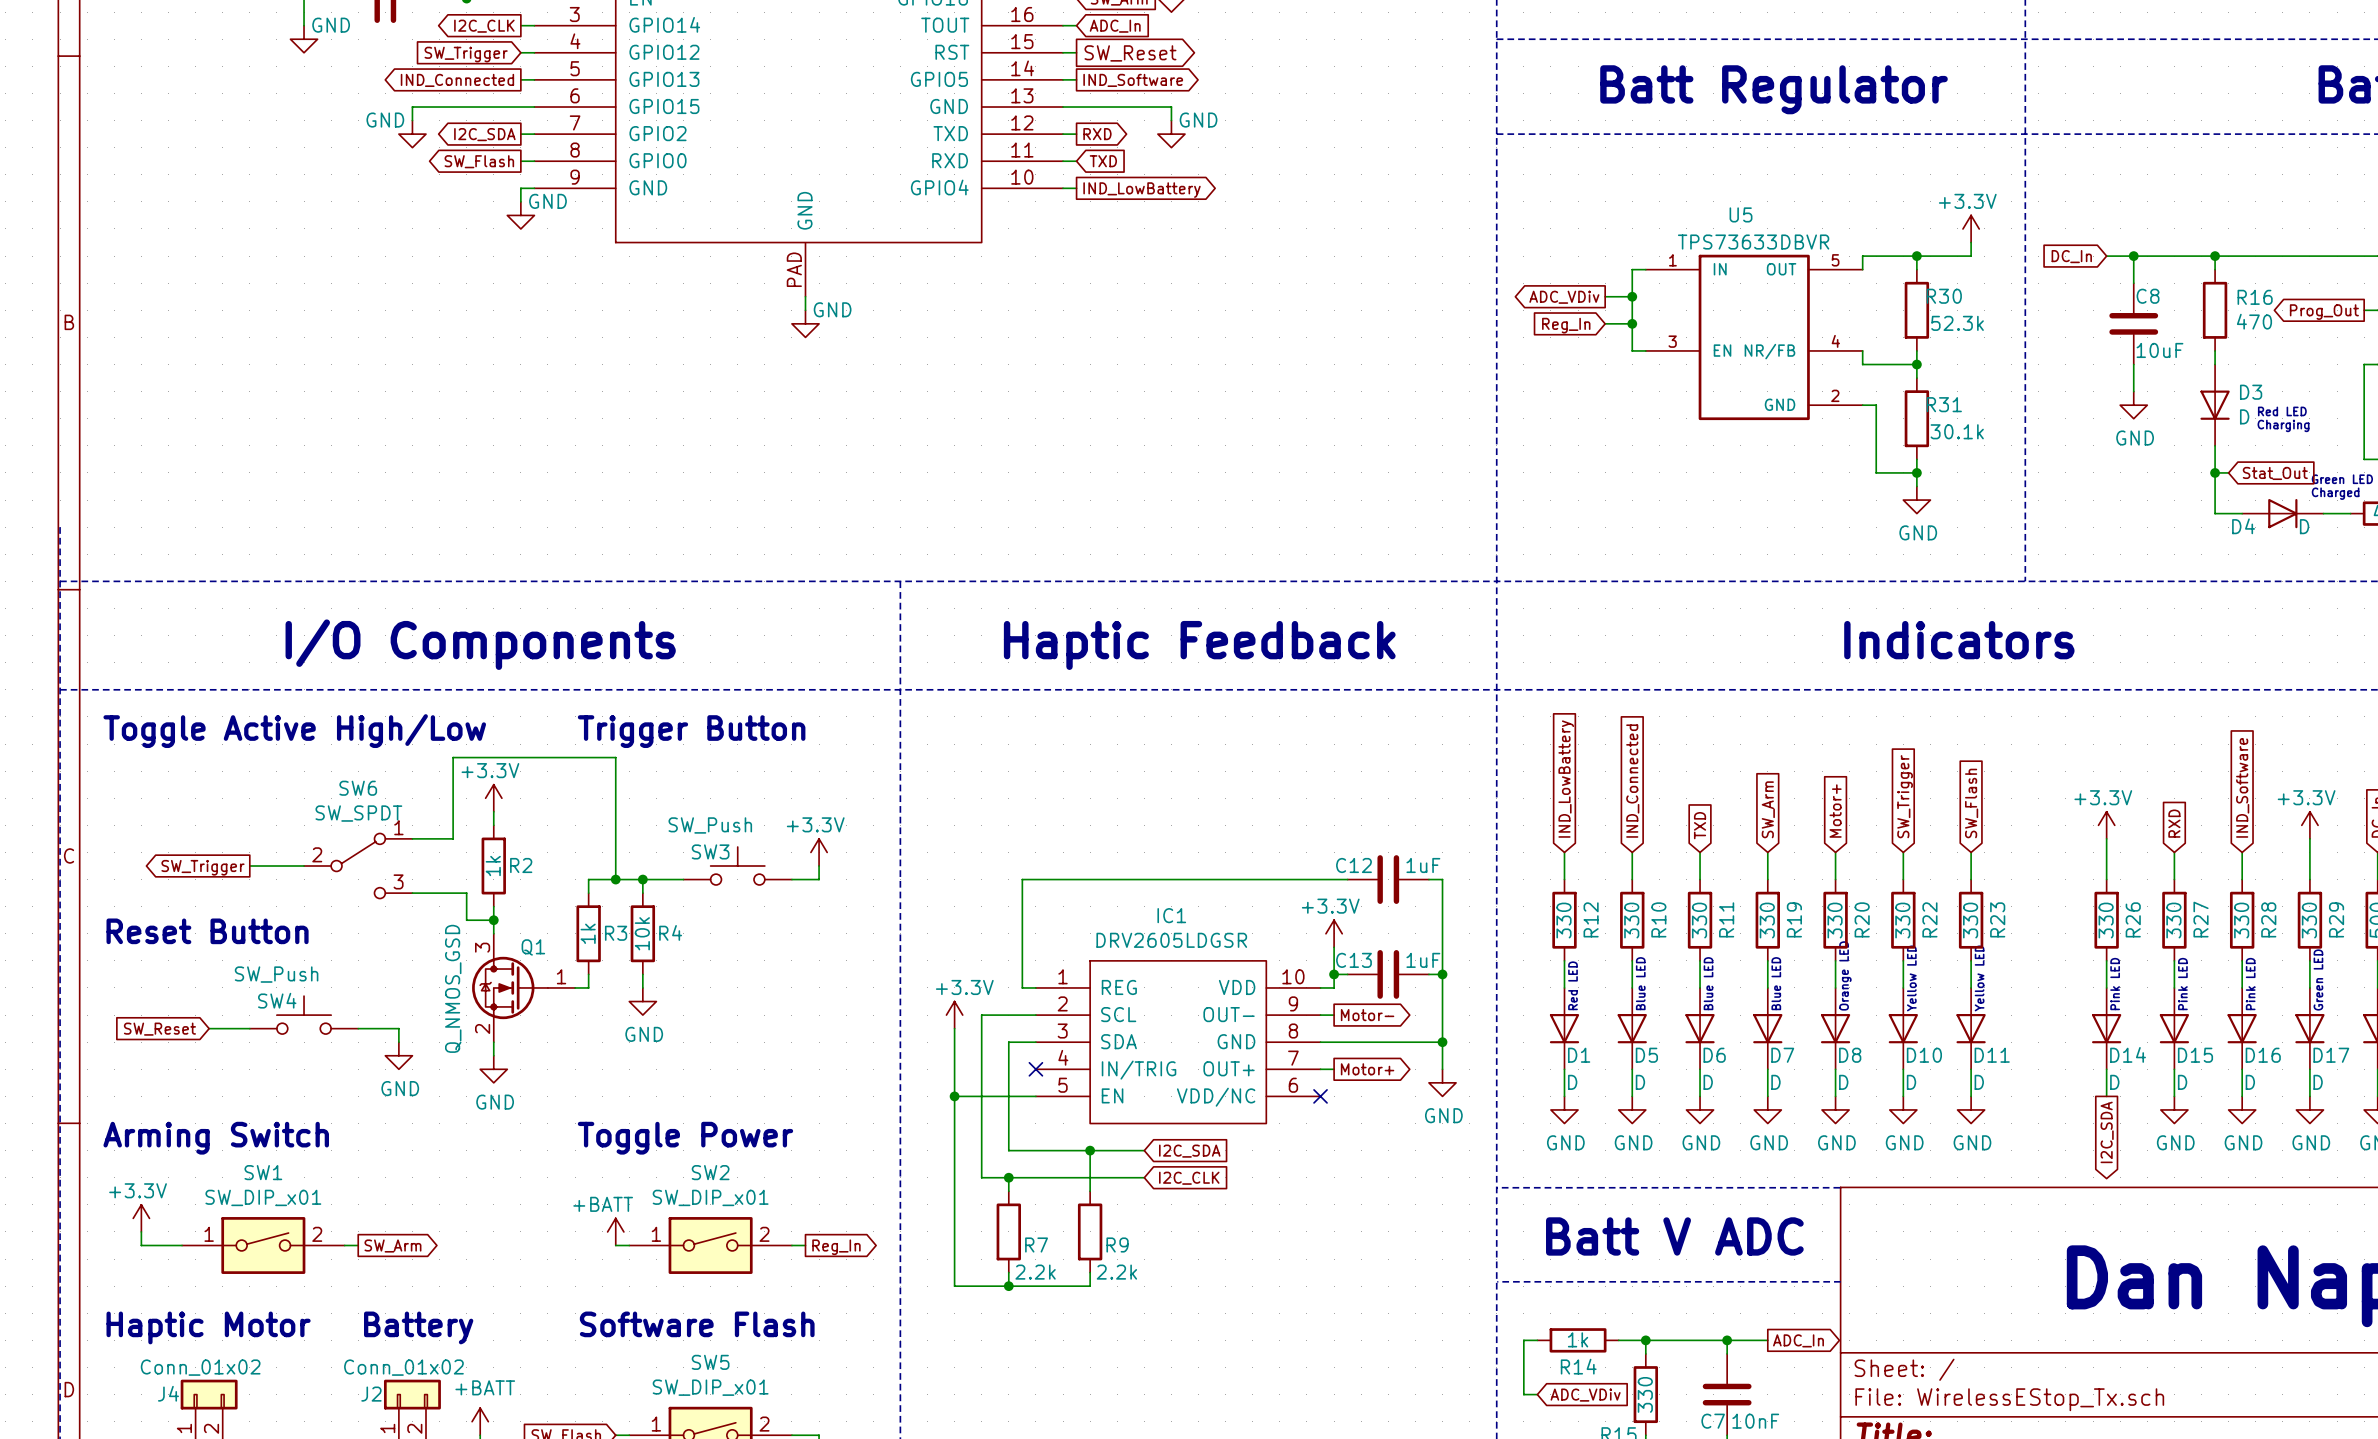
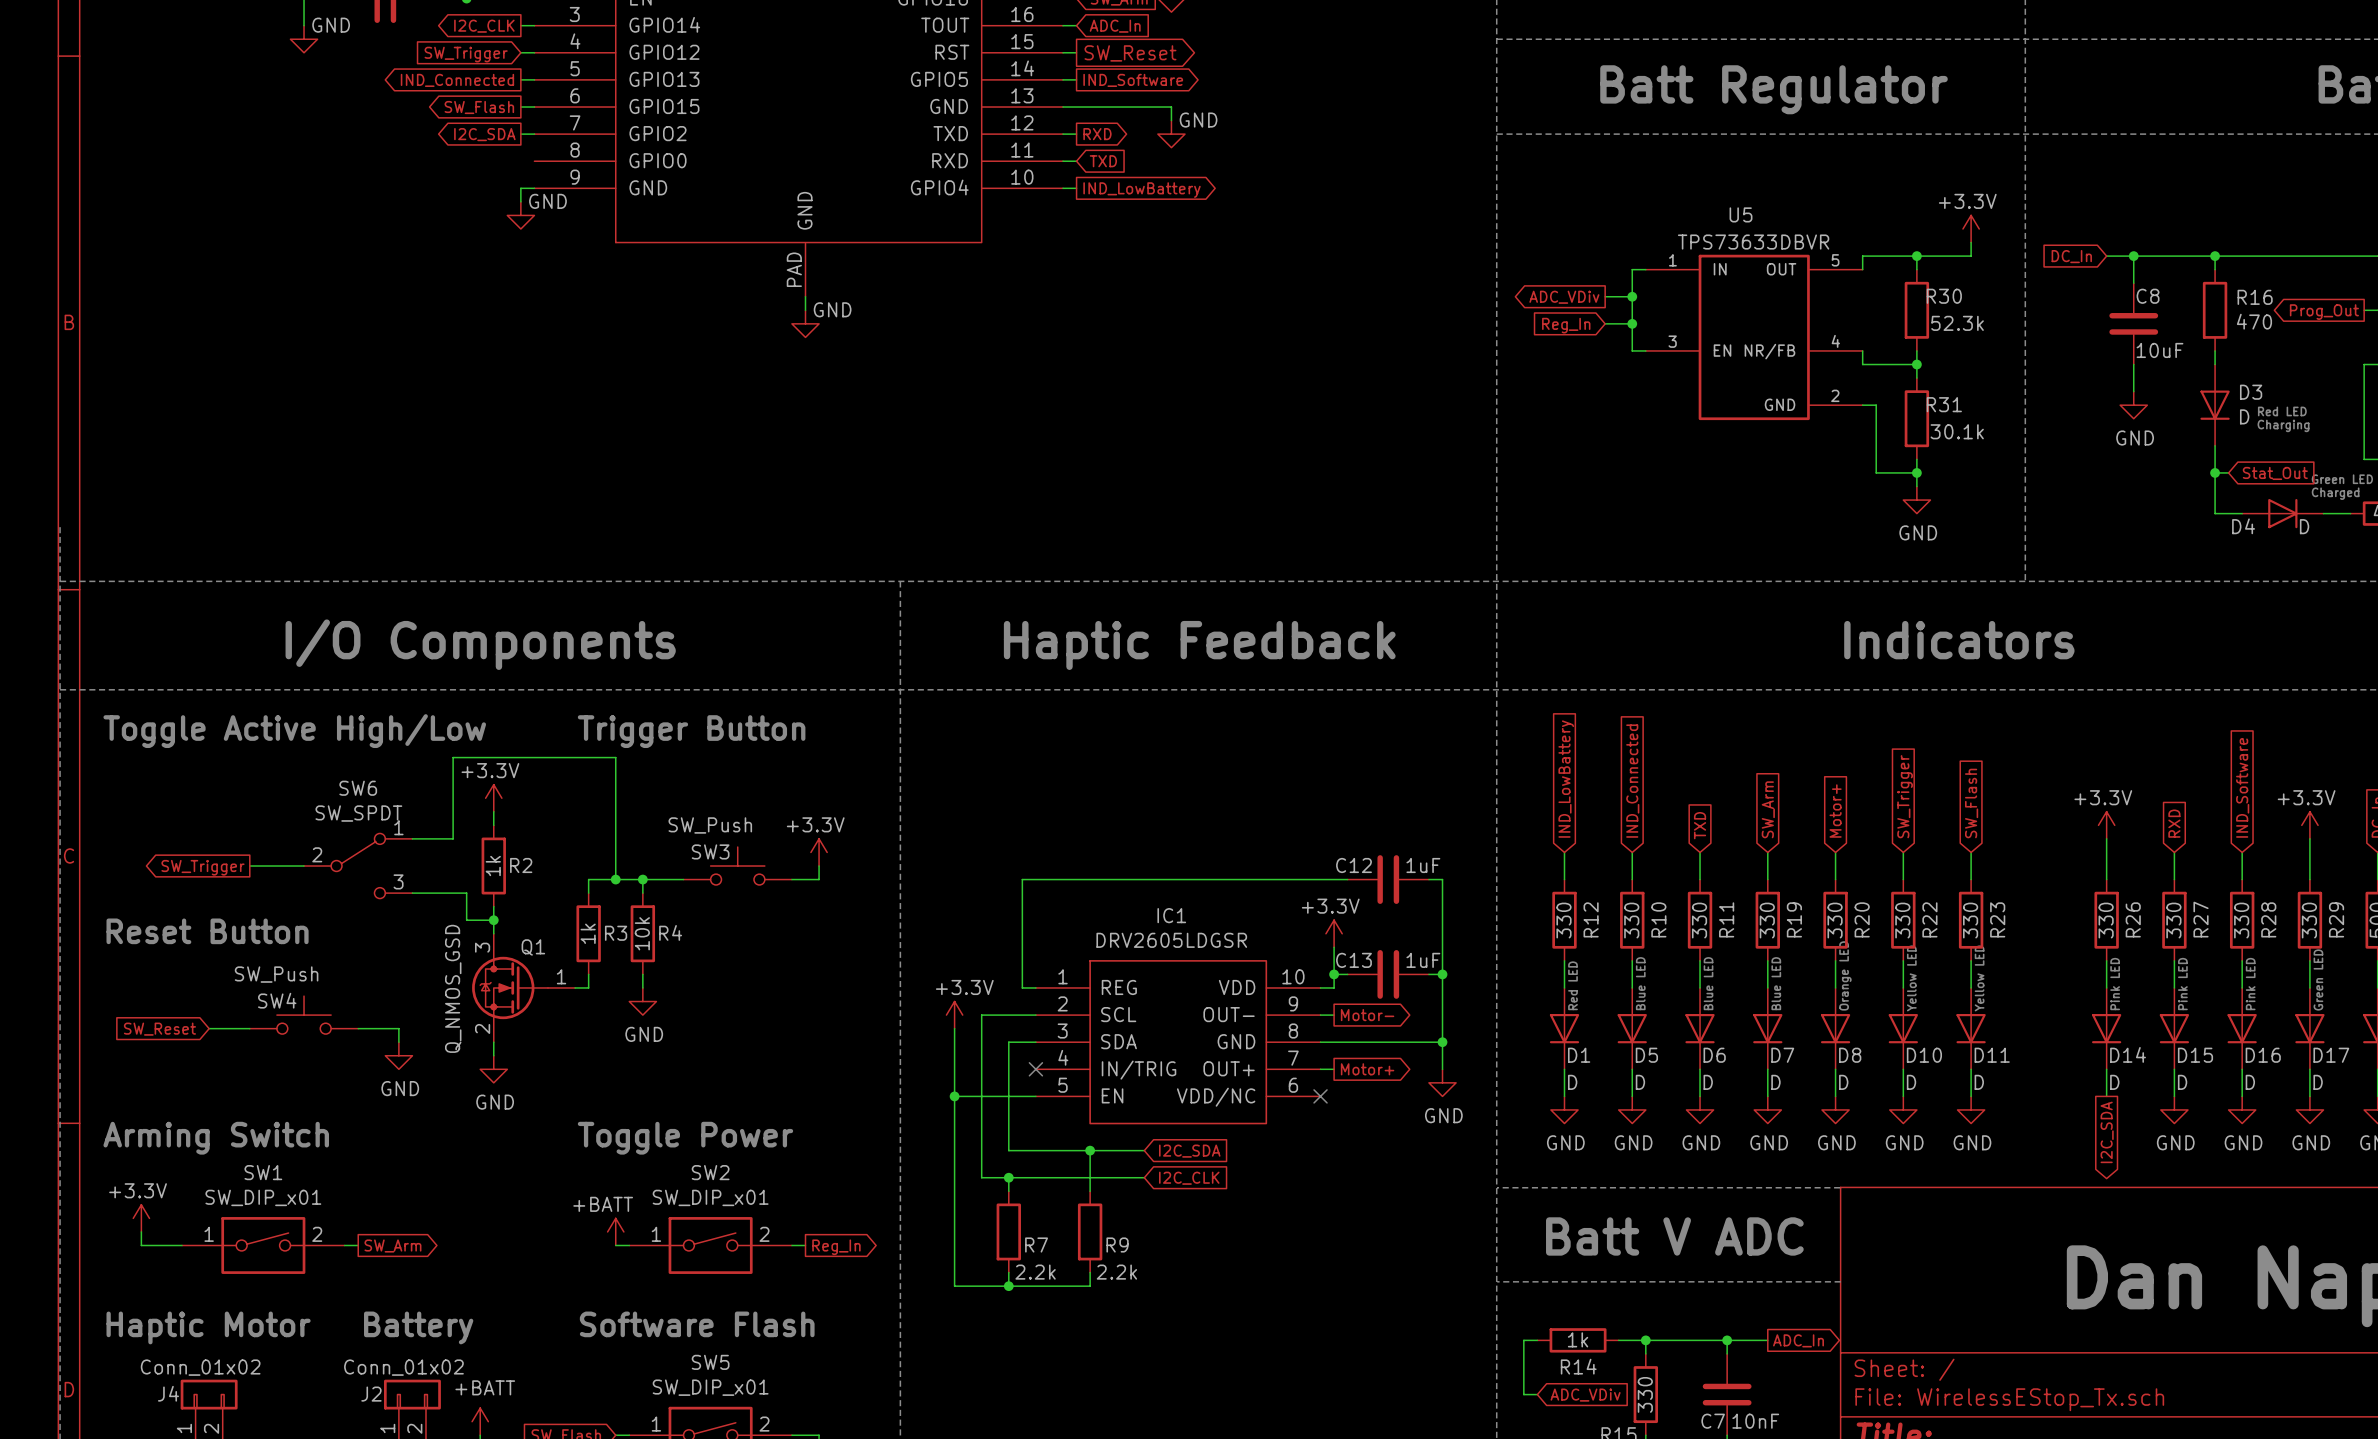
wire: (520, 107) (412, 107) (412, 120) -> none
power symbol: GND (412, 134) -> none
global label position: SW_Flash (479, 161) -> SW_Flash (479, 107)
wire: (520, 161) (534, 161) -> none

